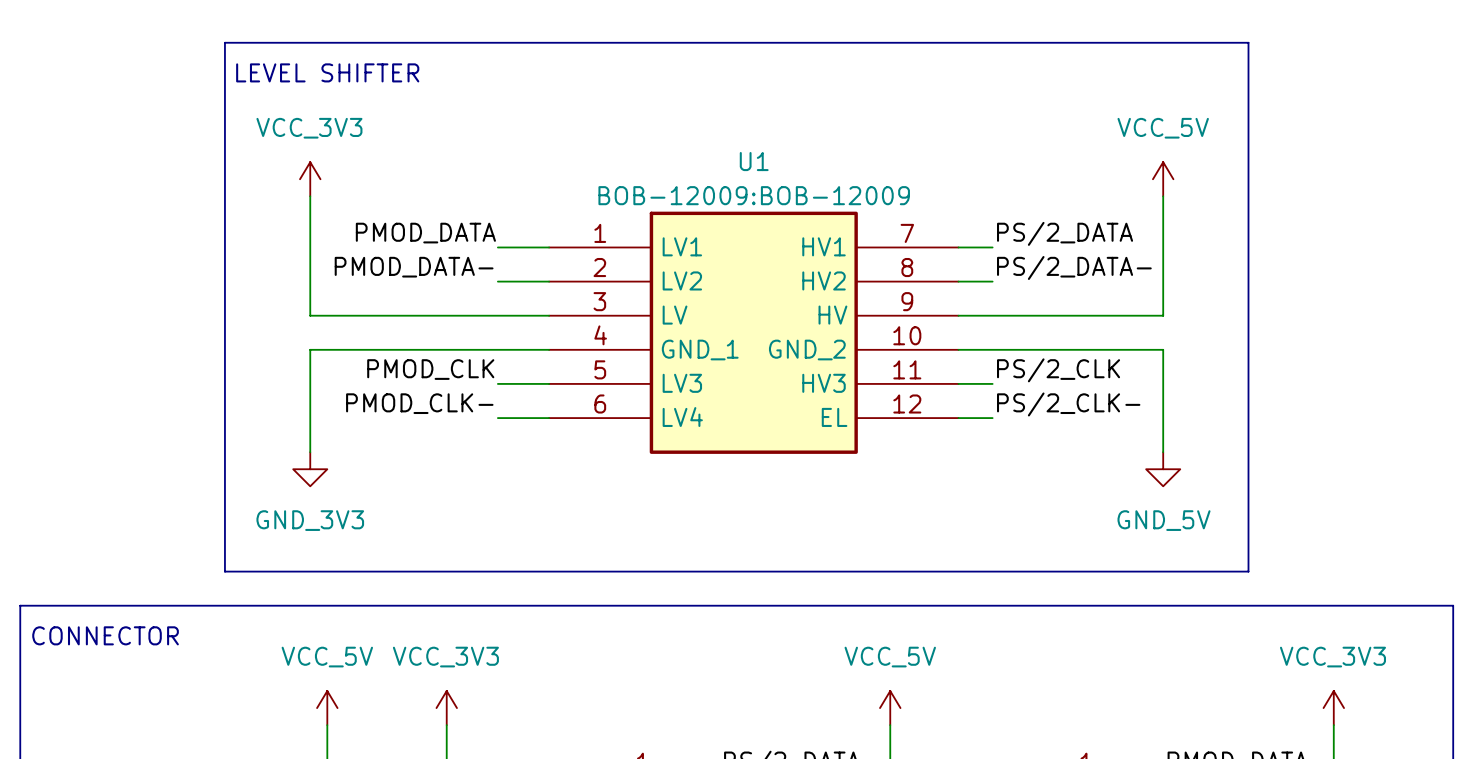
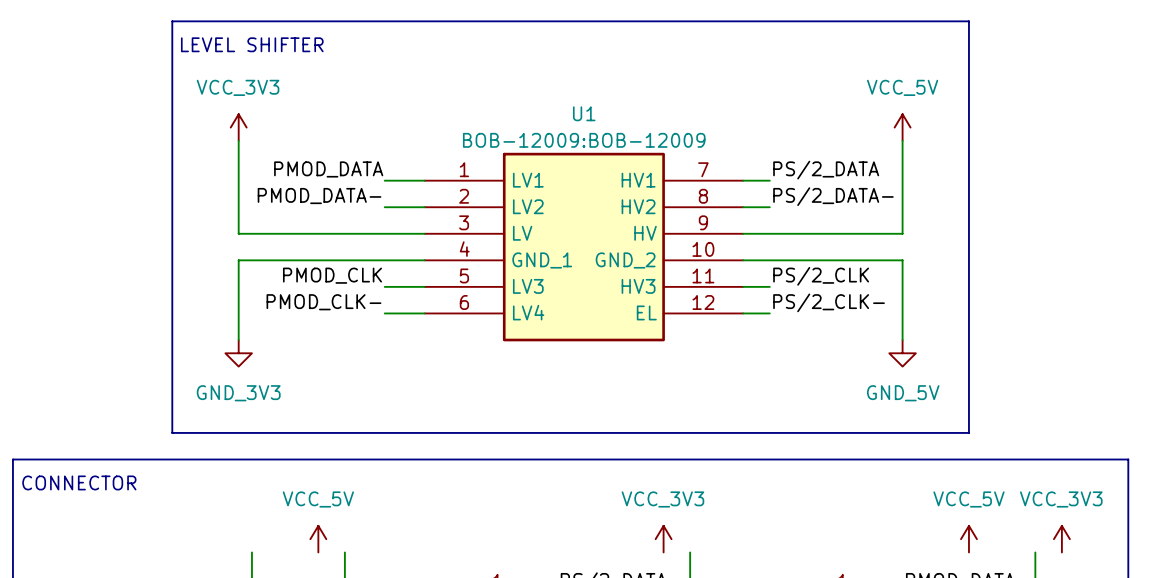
power symbol position: VCC_5V (327, 708) -> VCC_5V (318, 539)
power symbol: VCC_3V3 (446, 708) -> none
power symbol: none -> VCC_3V3 (663, 539)
power symbol: VCC_5V (890, 708) -> none
power symbol: none -> VCC_5V (968, 539)
power symbol position: VCC_3V3 (1333, 708) -> VCC_3V3 (1061, 539)

